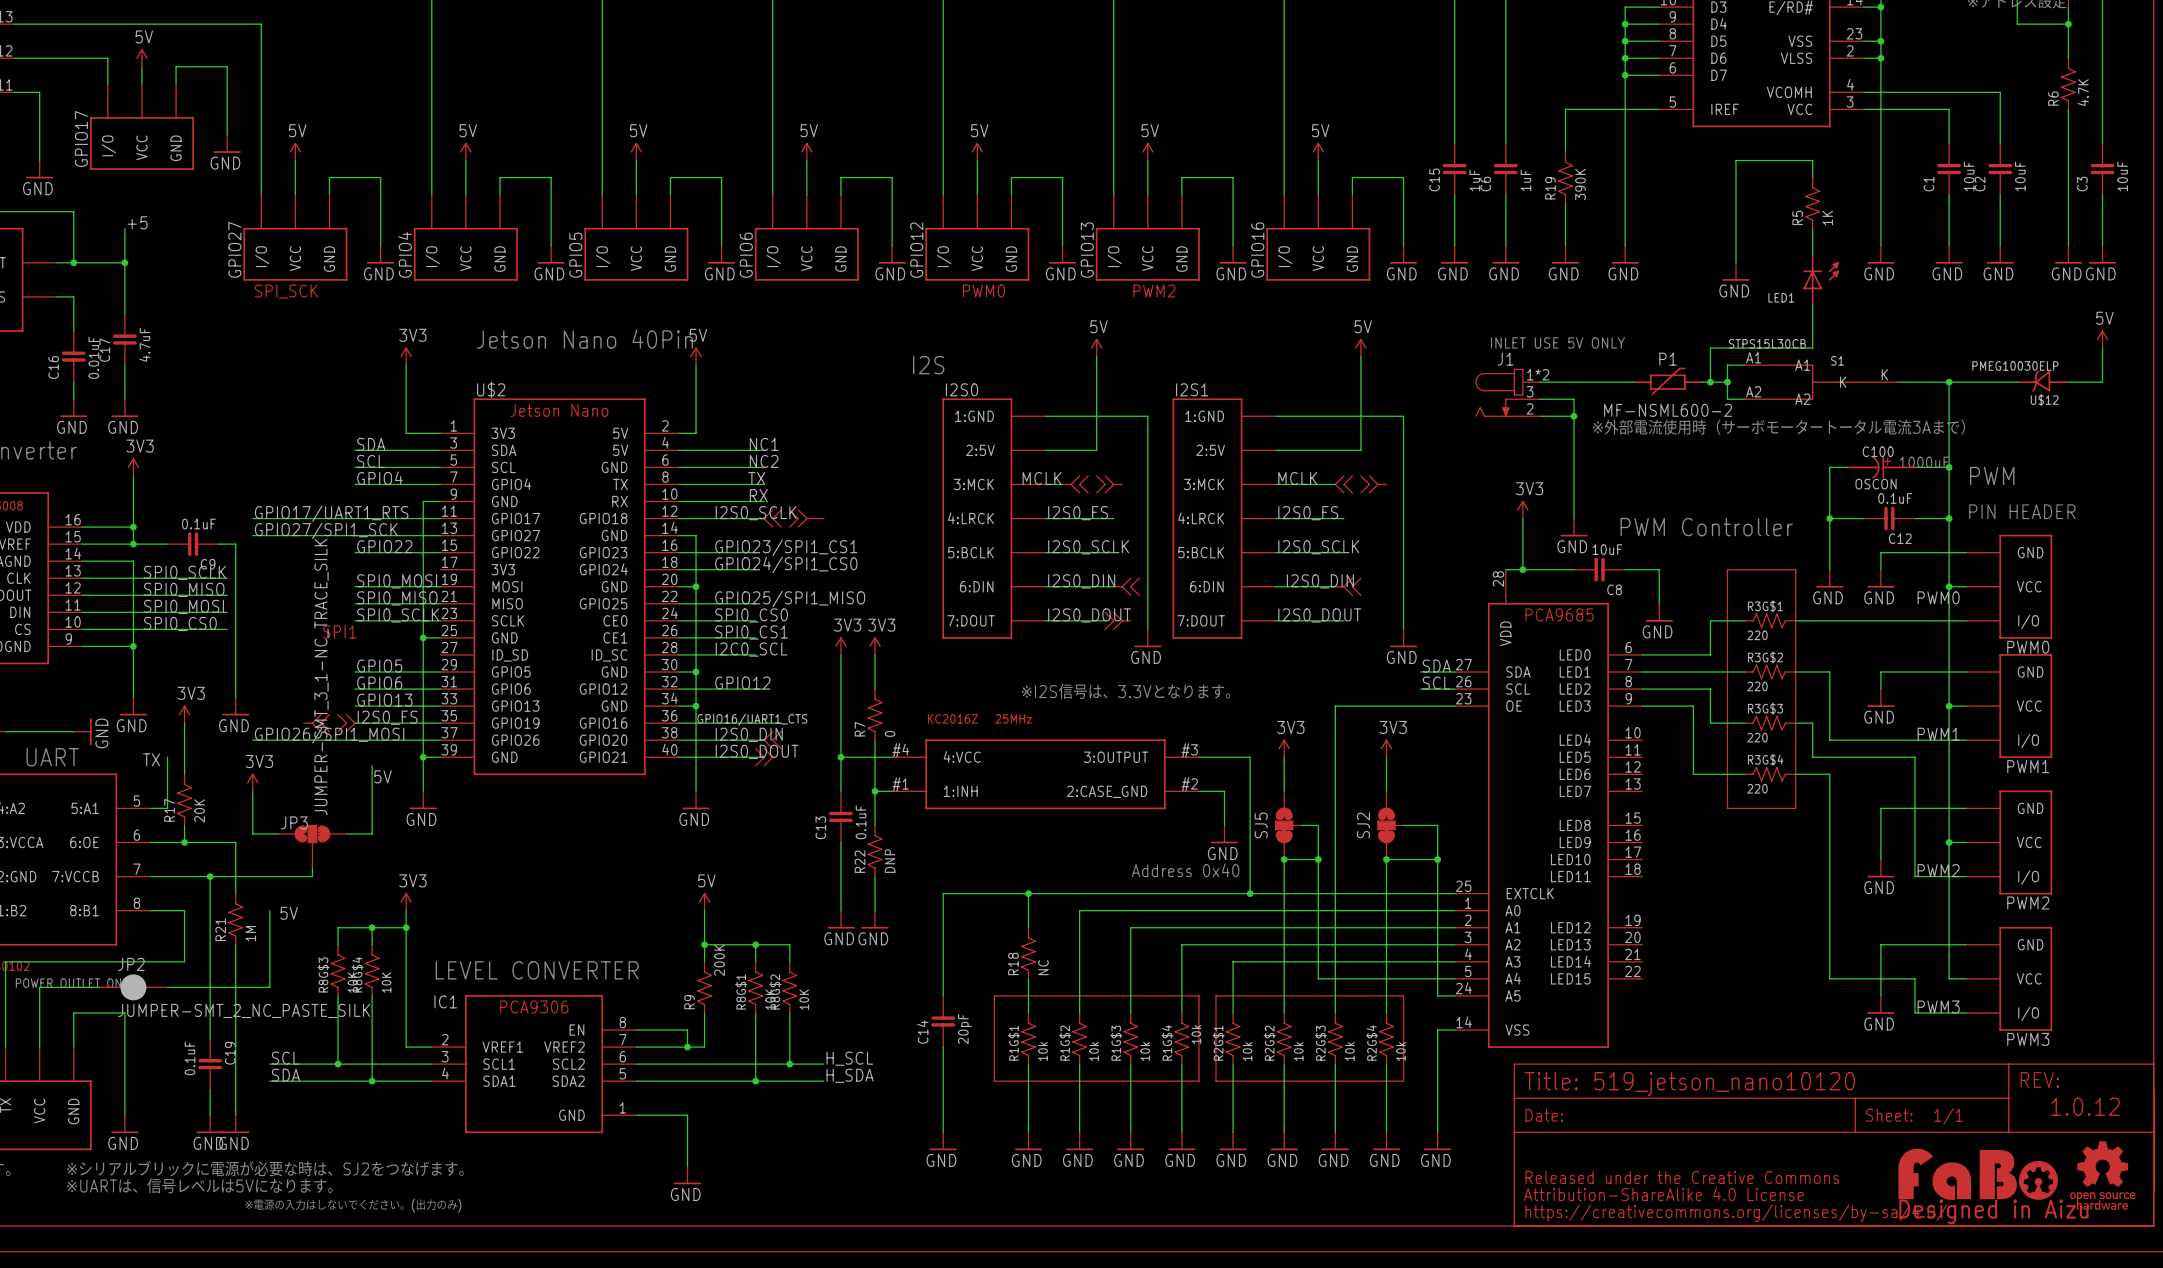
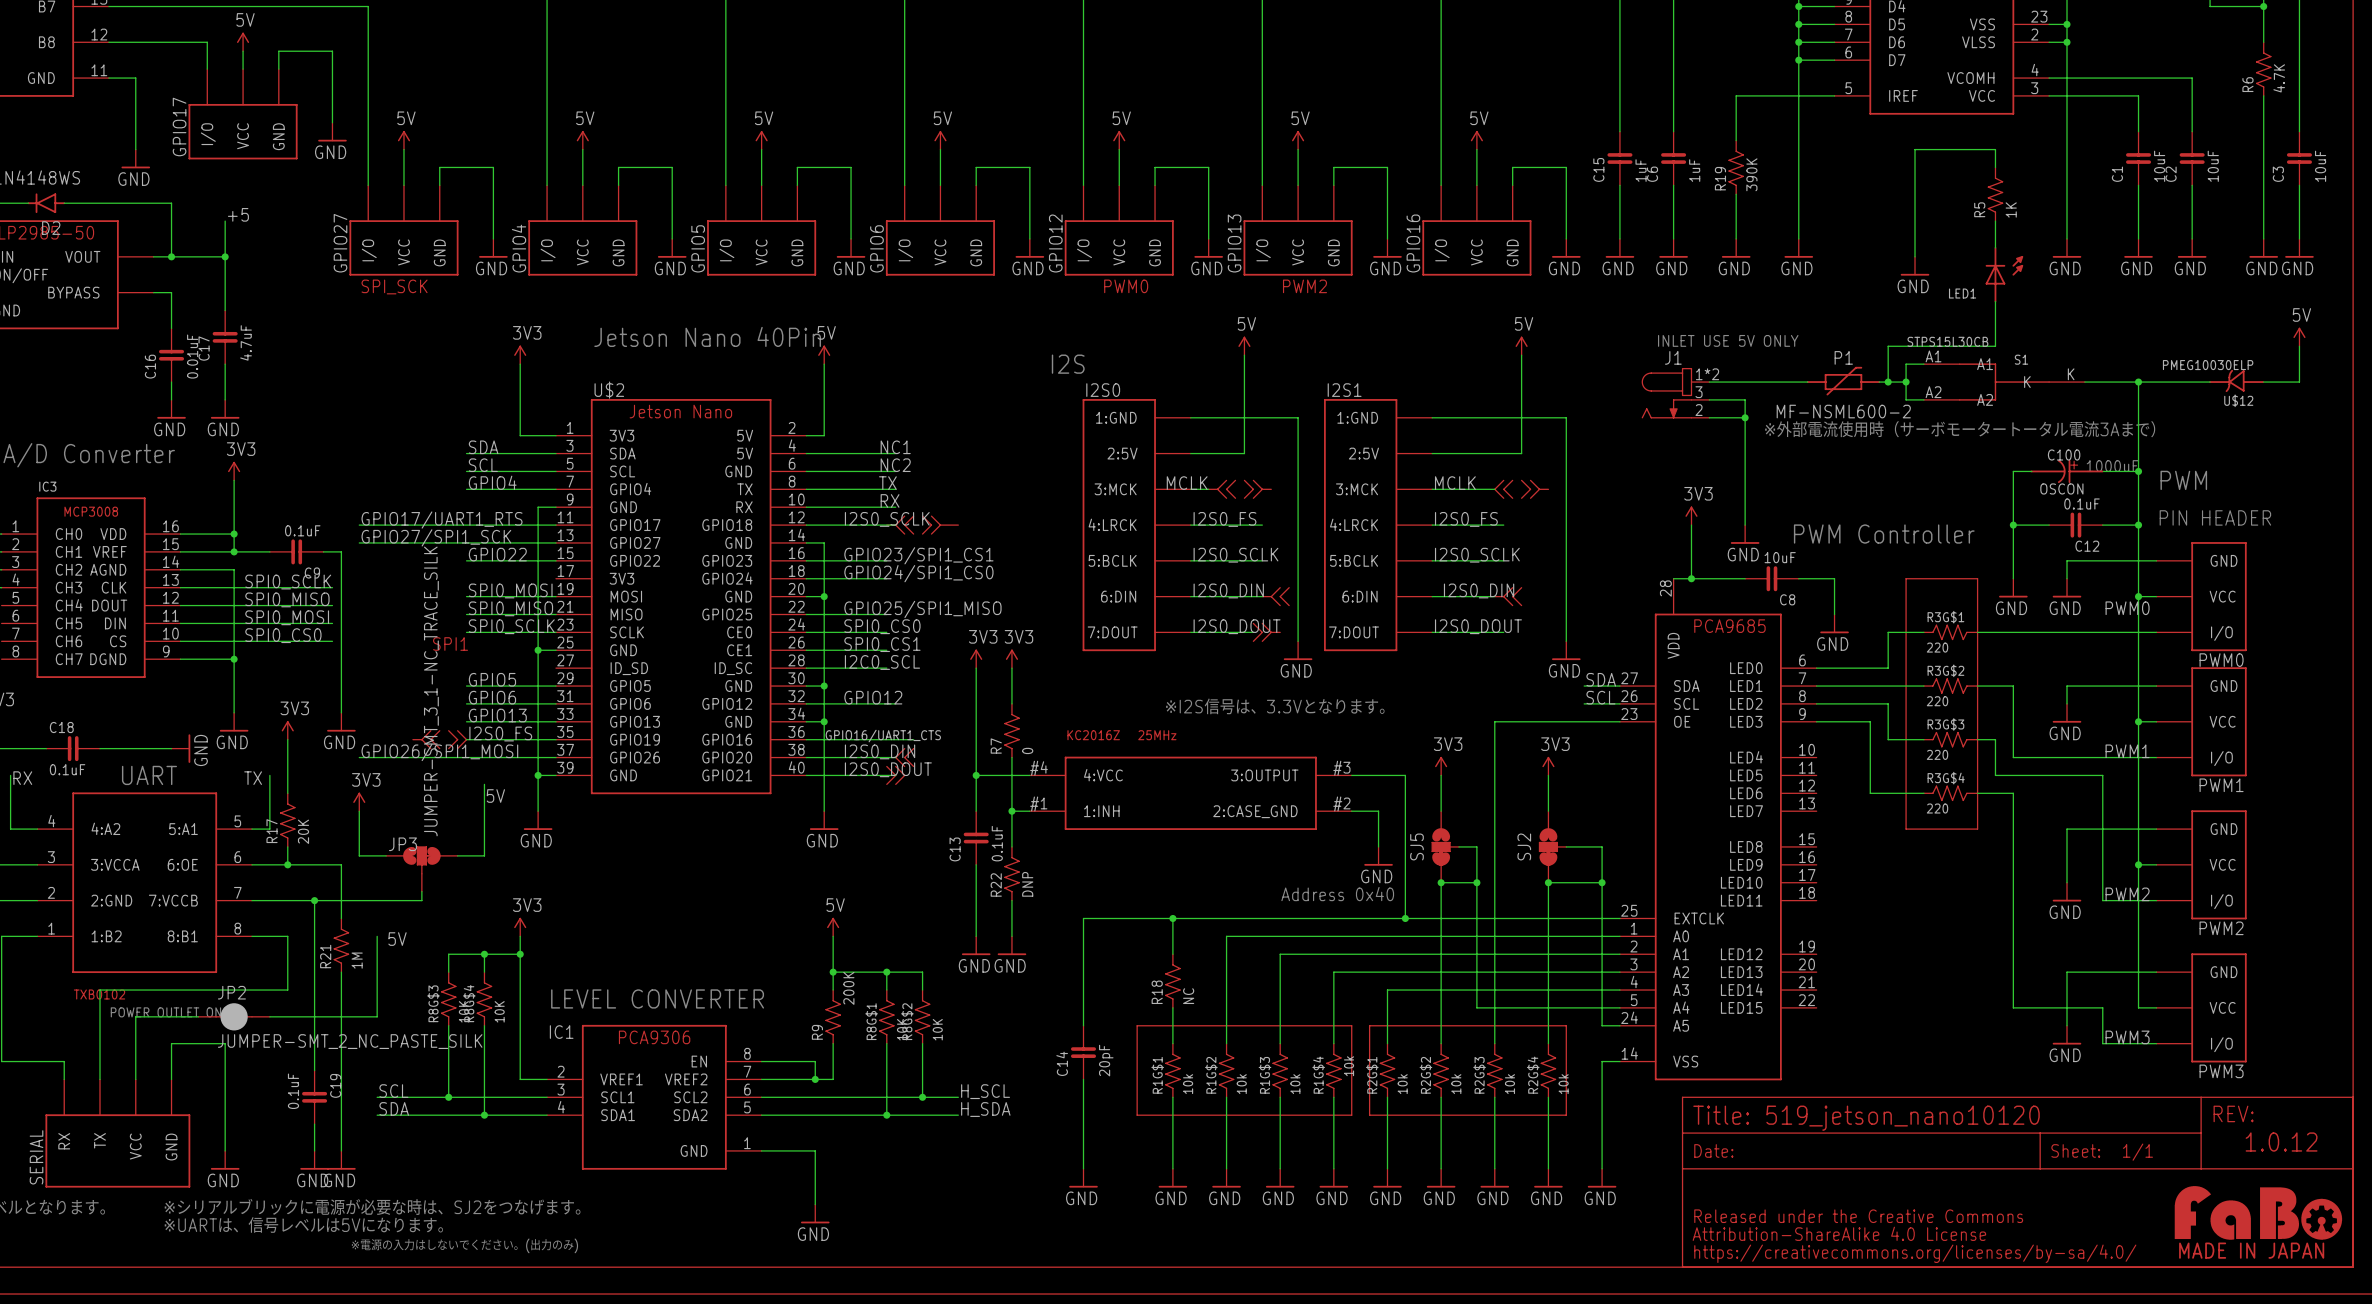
part: (1978, 1174) -> none
part: none -> (2258, 1212)
part: (2102, 1175) -> none

